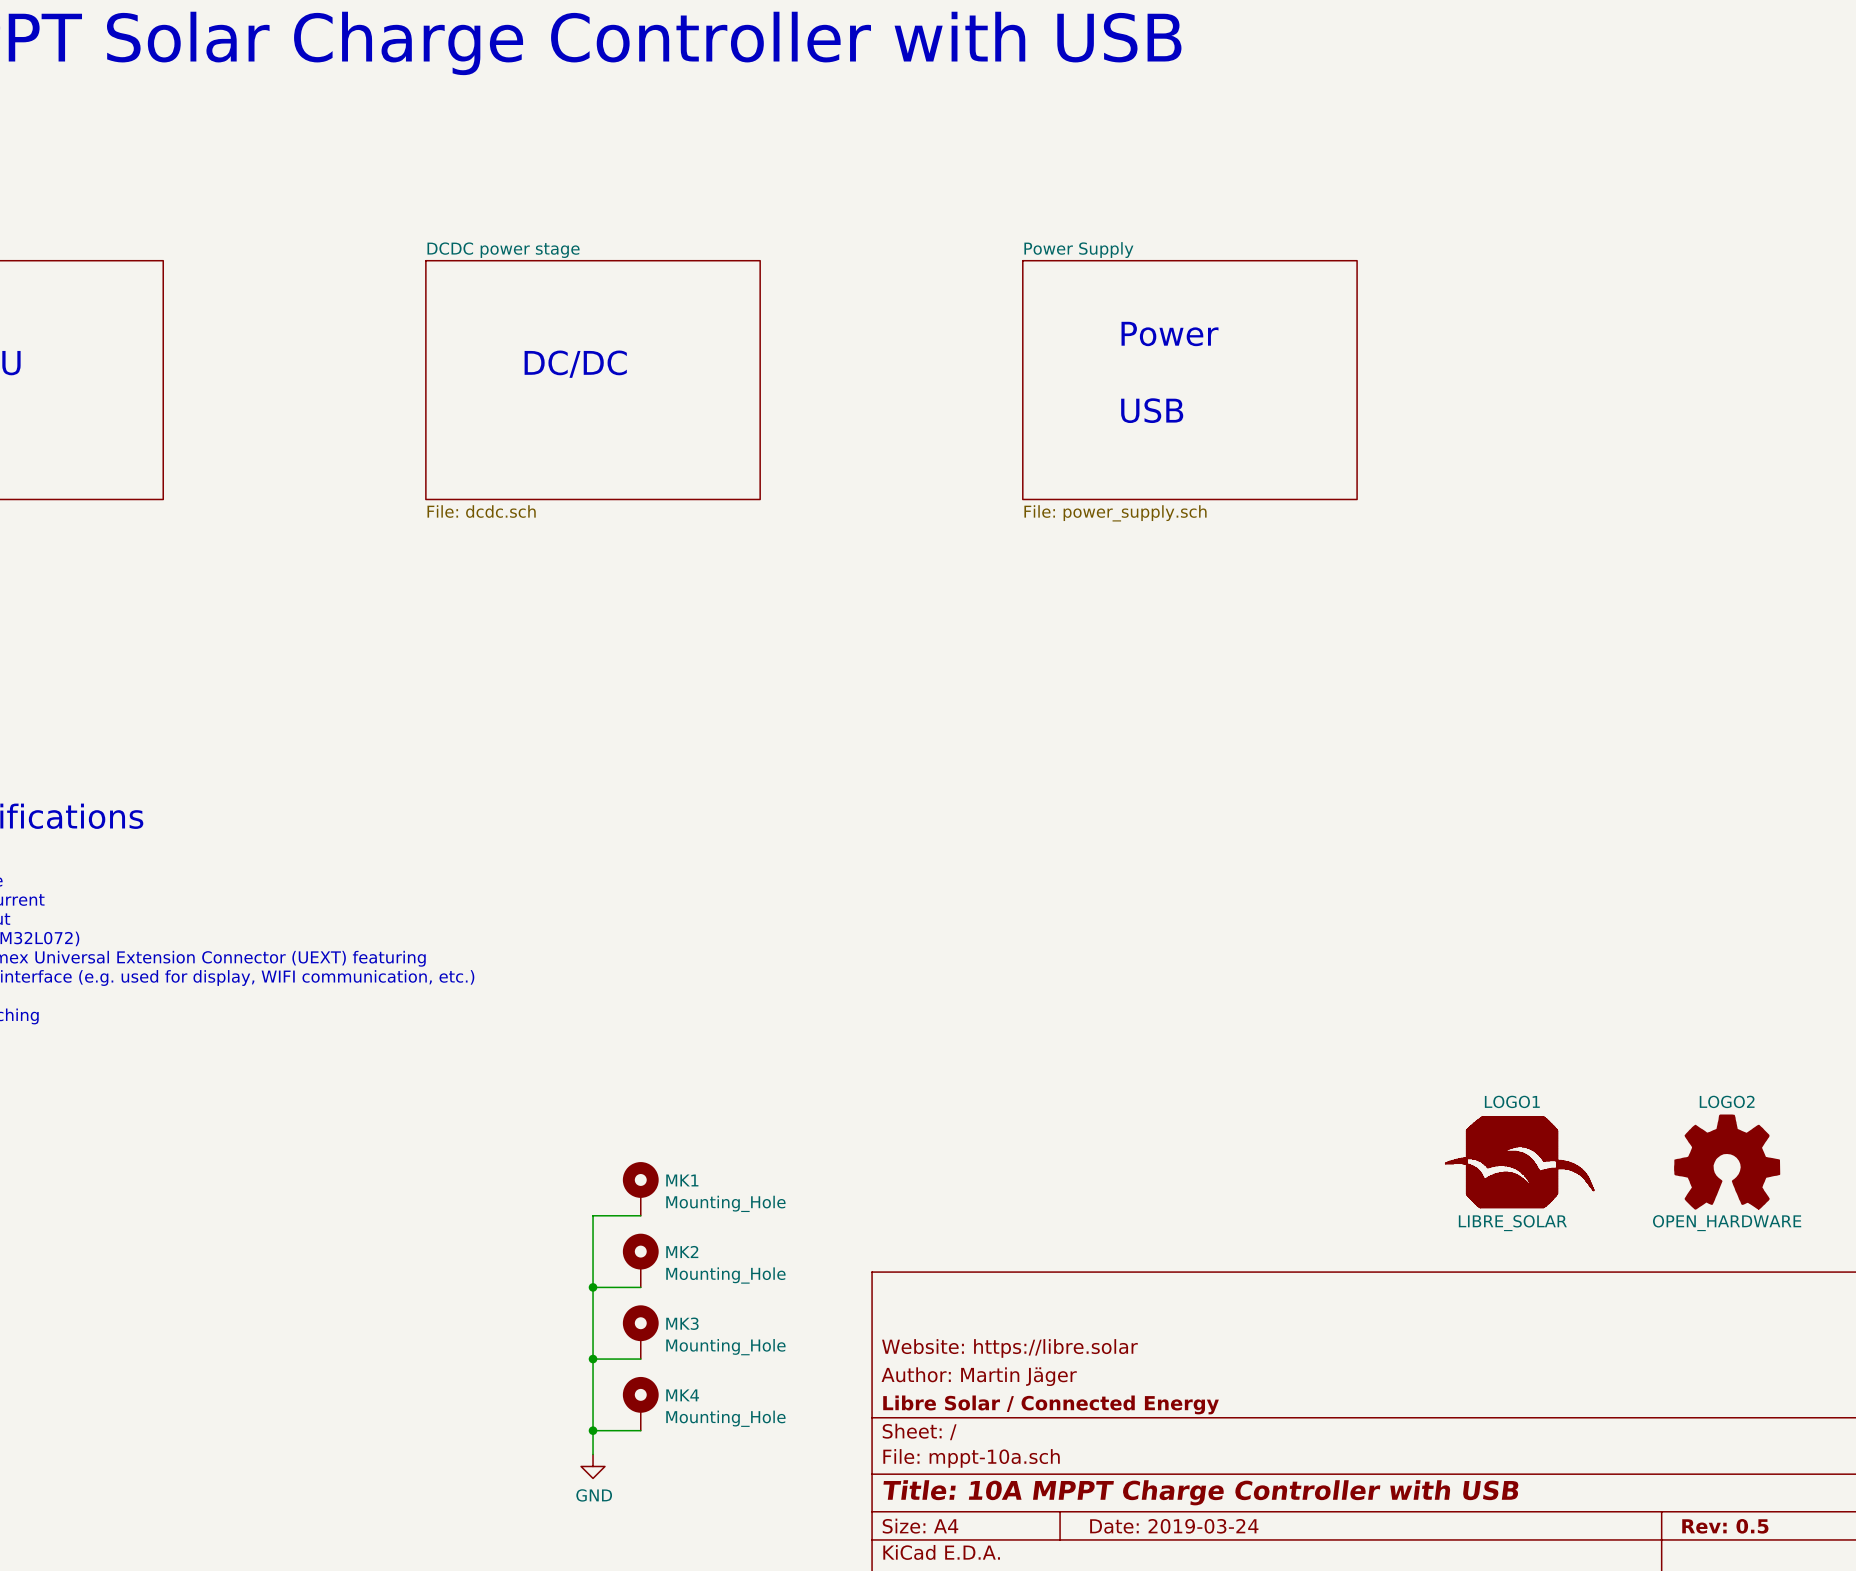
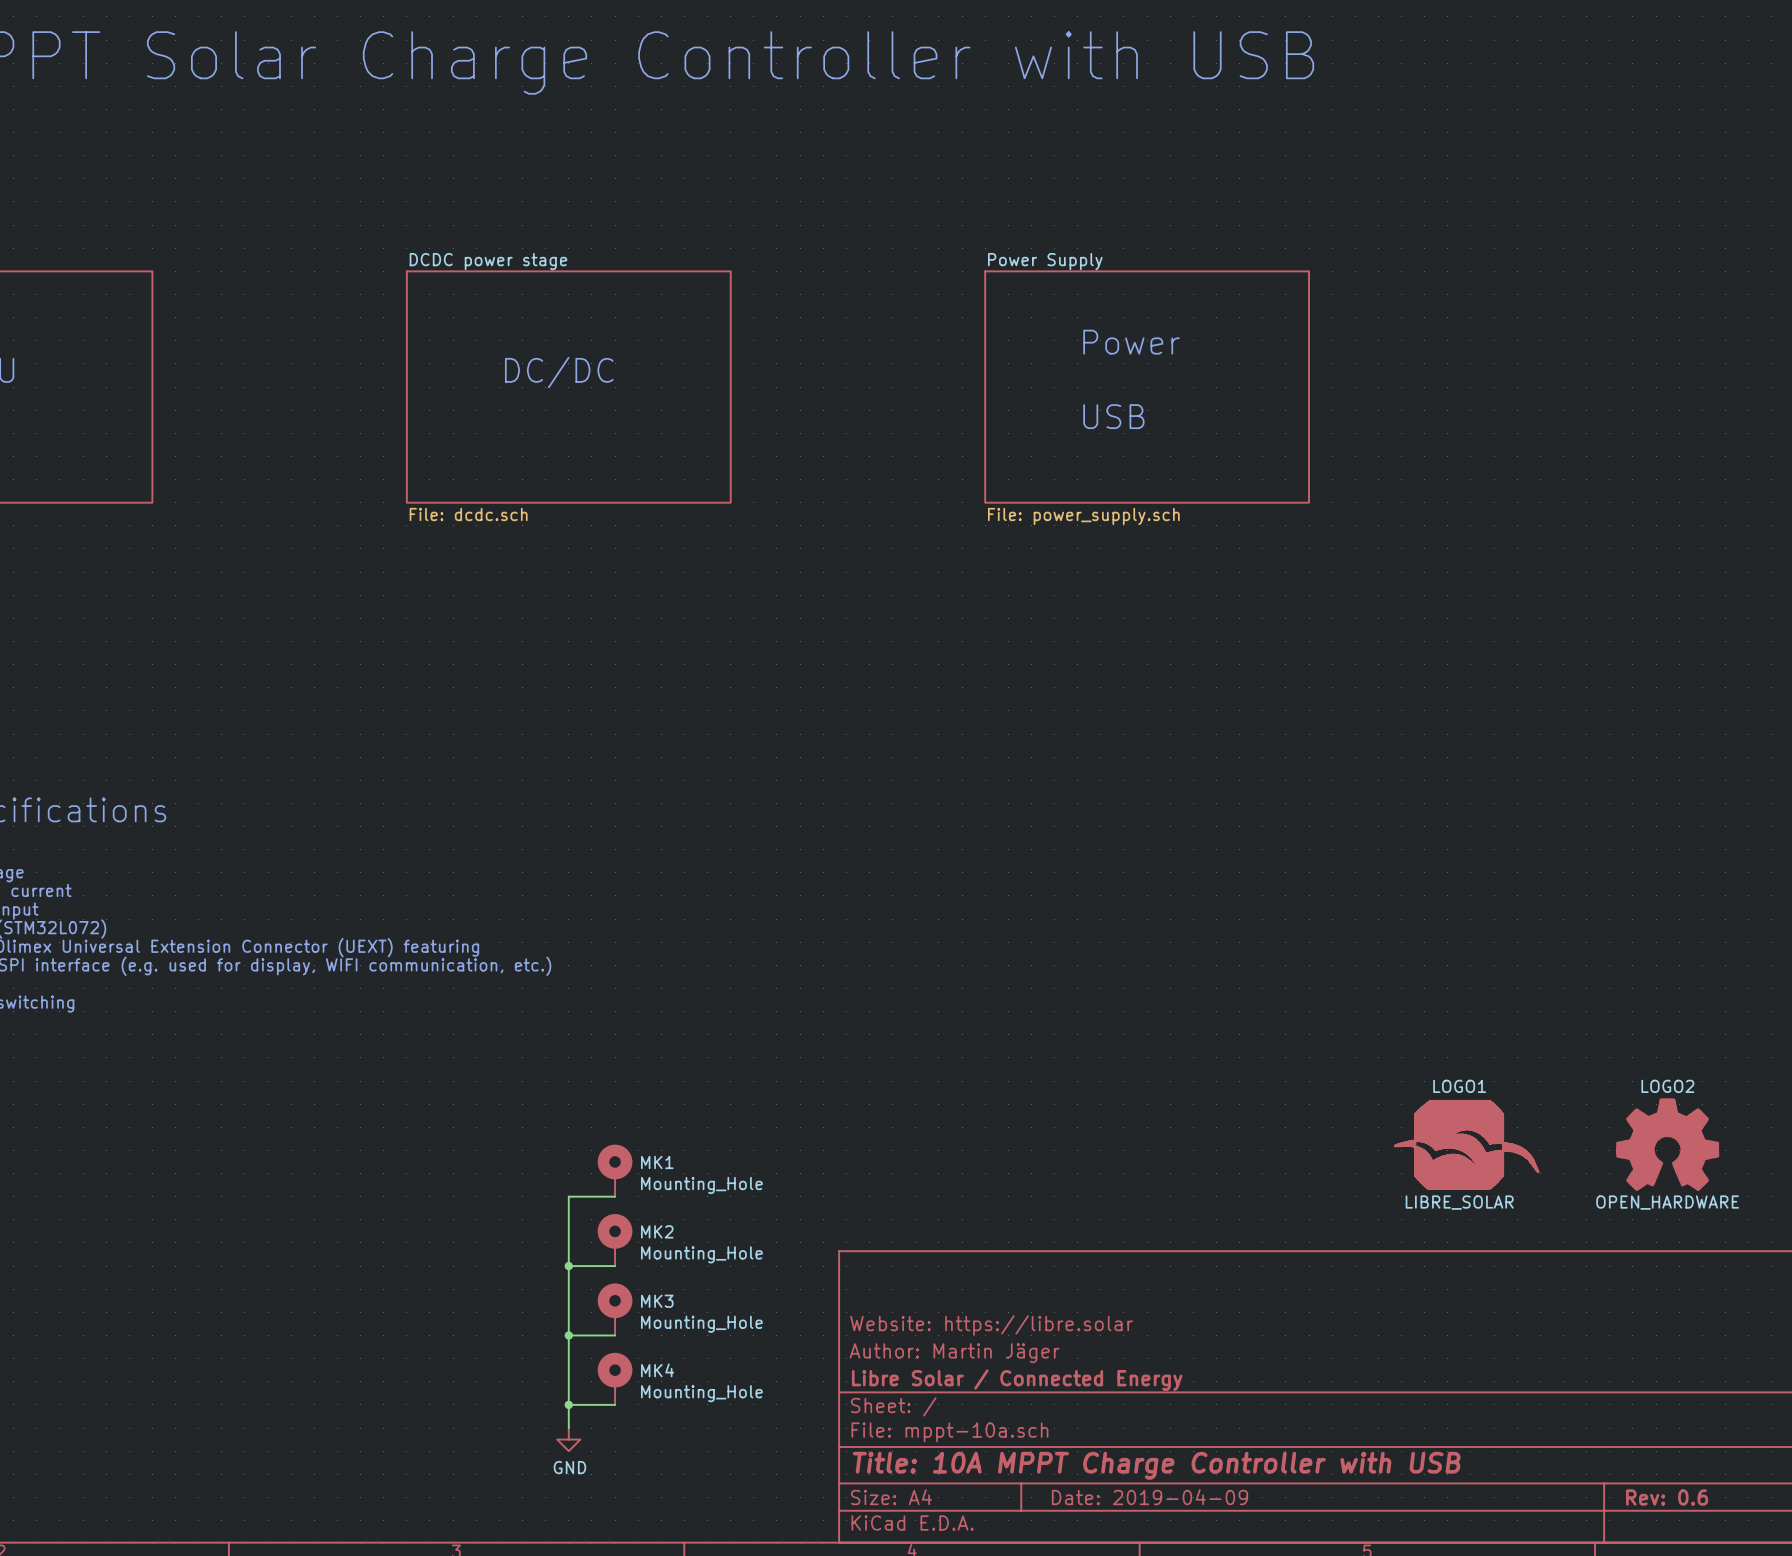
title block: Date: 2019-03-24 (1174, 1526) -> Date: 2019-04-09 (1150, 1497)
title block: Rev: 0.5 (1725, 1526) -> Rev: 0.6 (1667, 1497)

